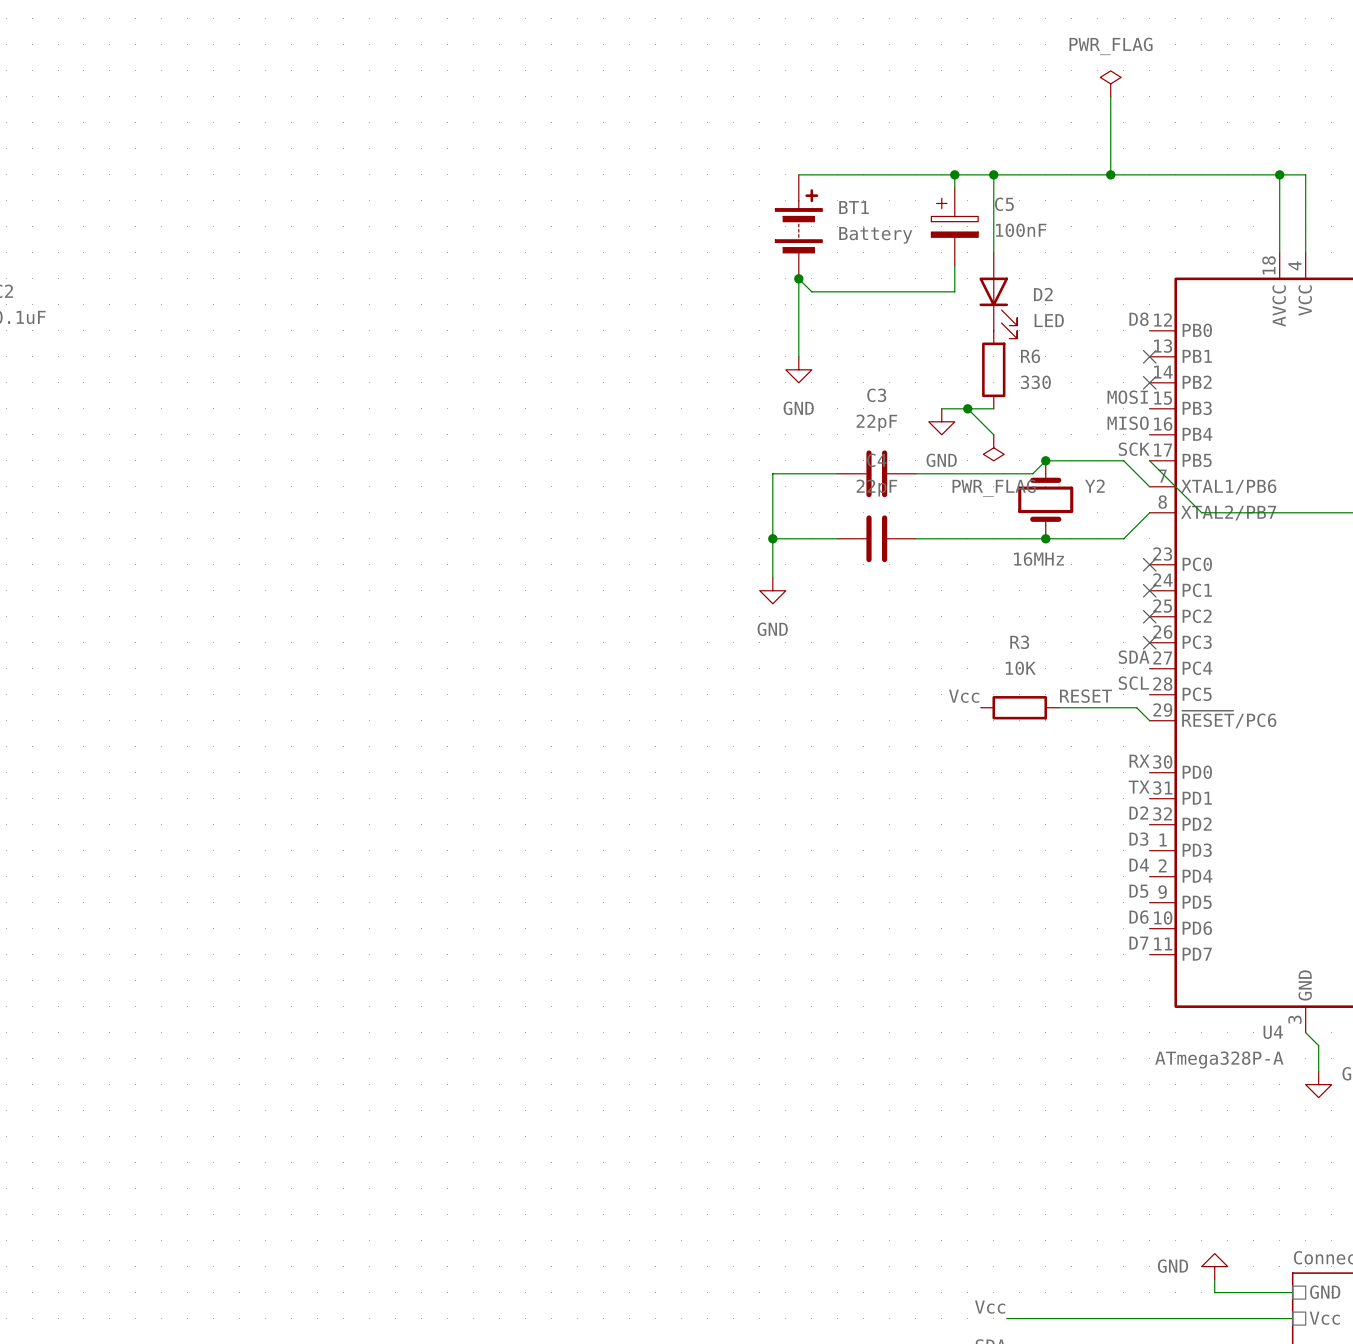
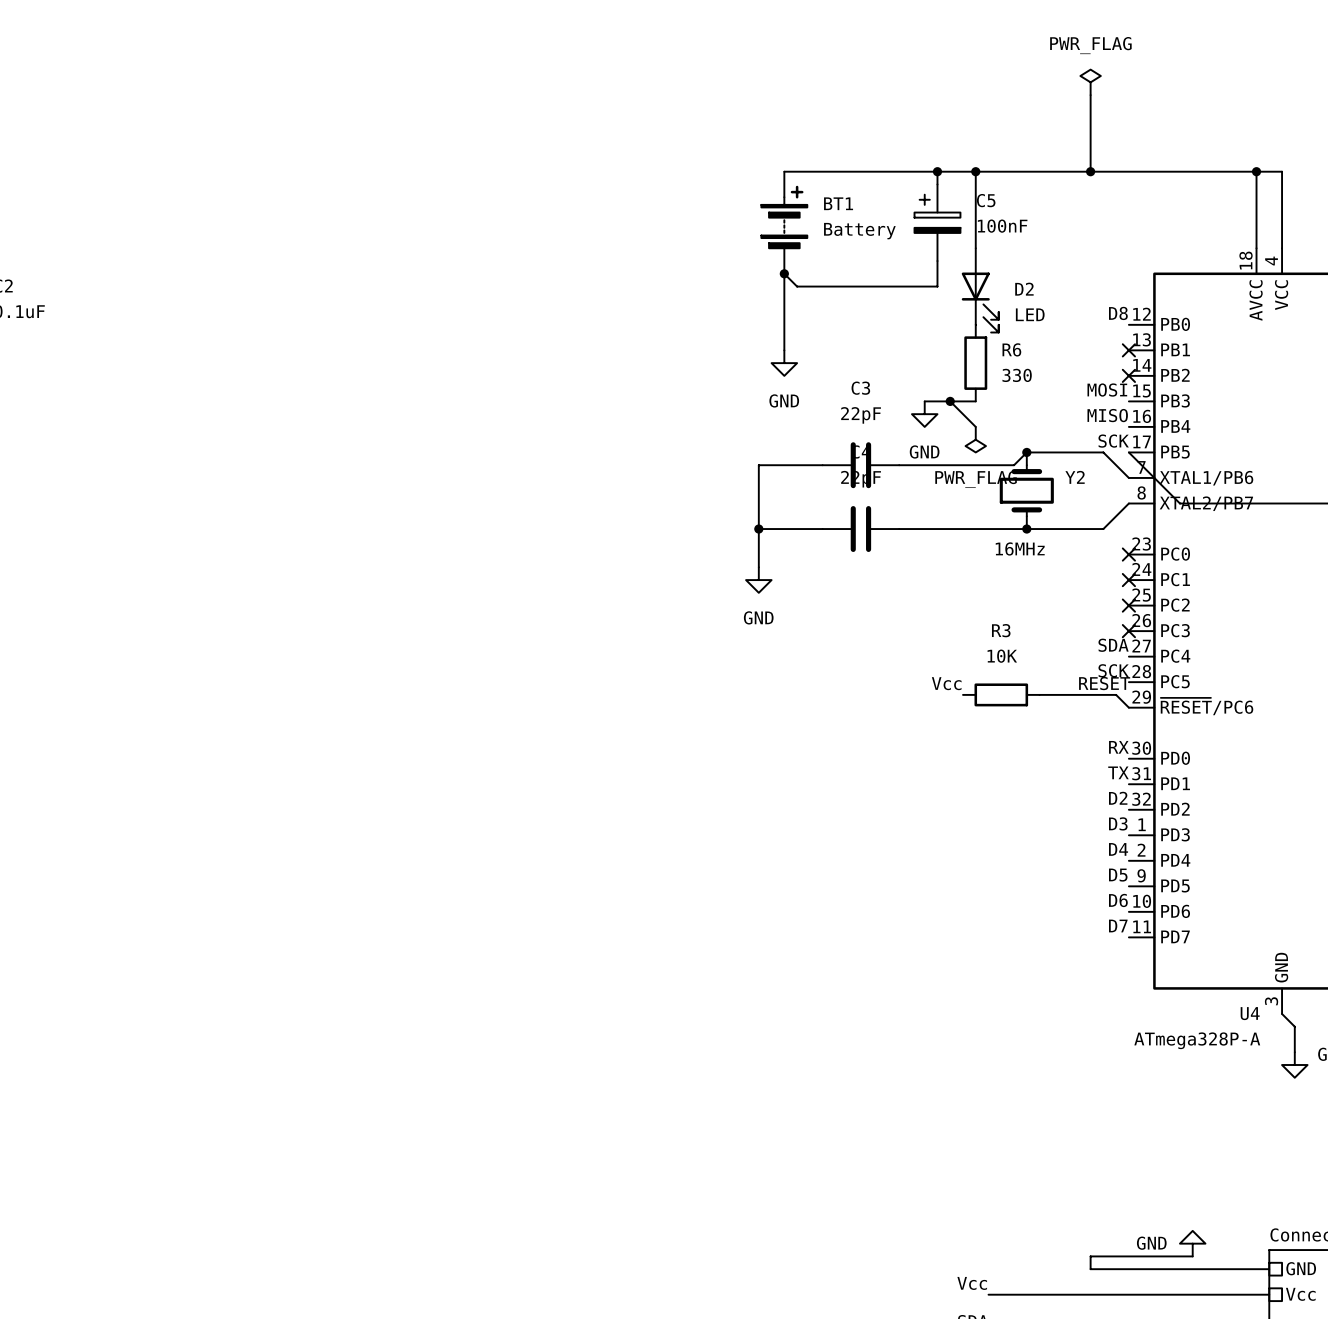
label: SCL (1133, 683) -> SCK (1113, 670)
label position: RESET (1086, 696) -> RESET (1104, 683)
wire: (1214, 1279) (1214, 1292) -> (1192, 1256) (1090, 1256) (1090, 1269) (1192, 1269)

